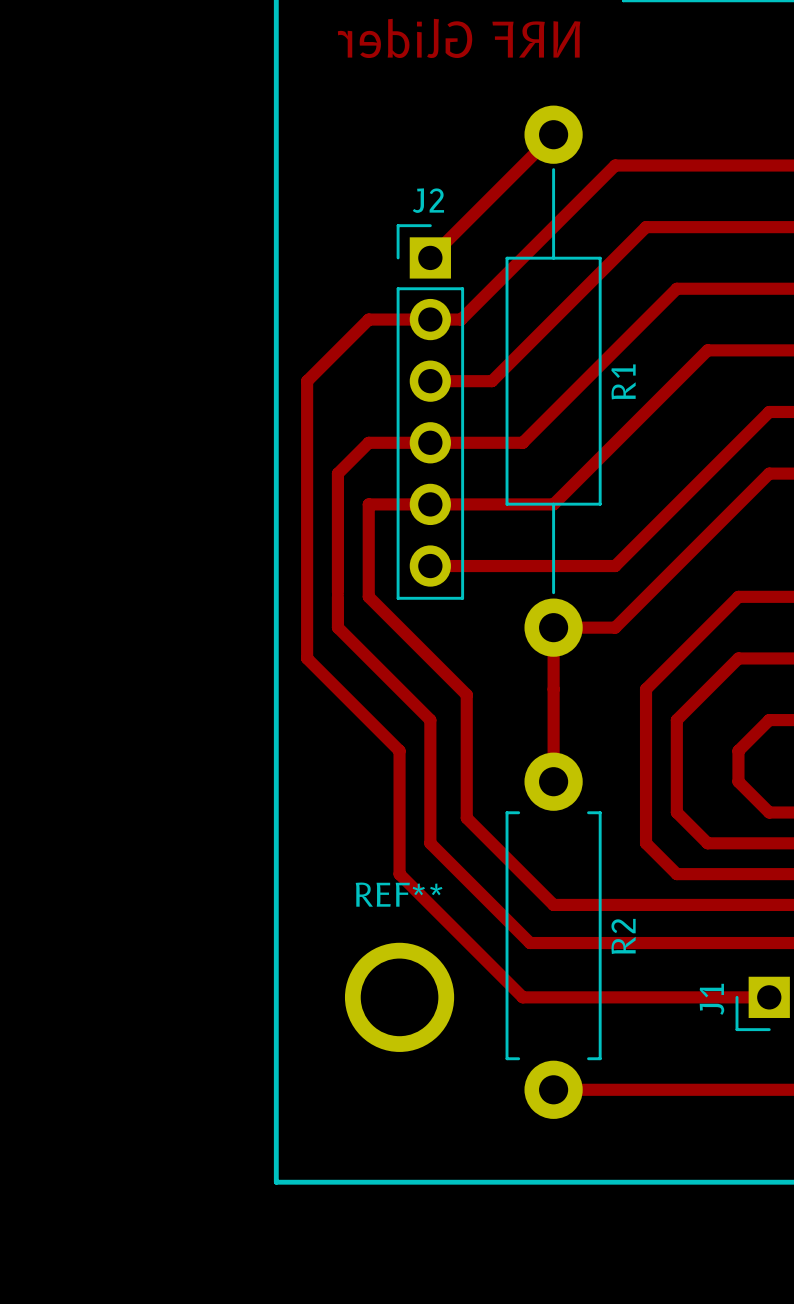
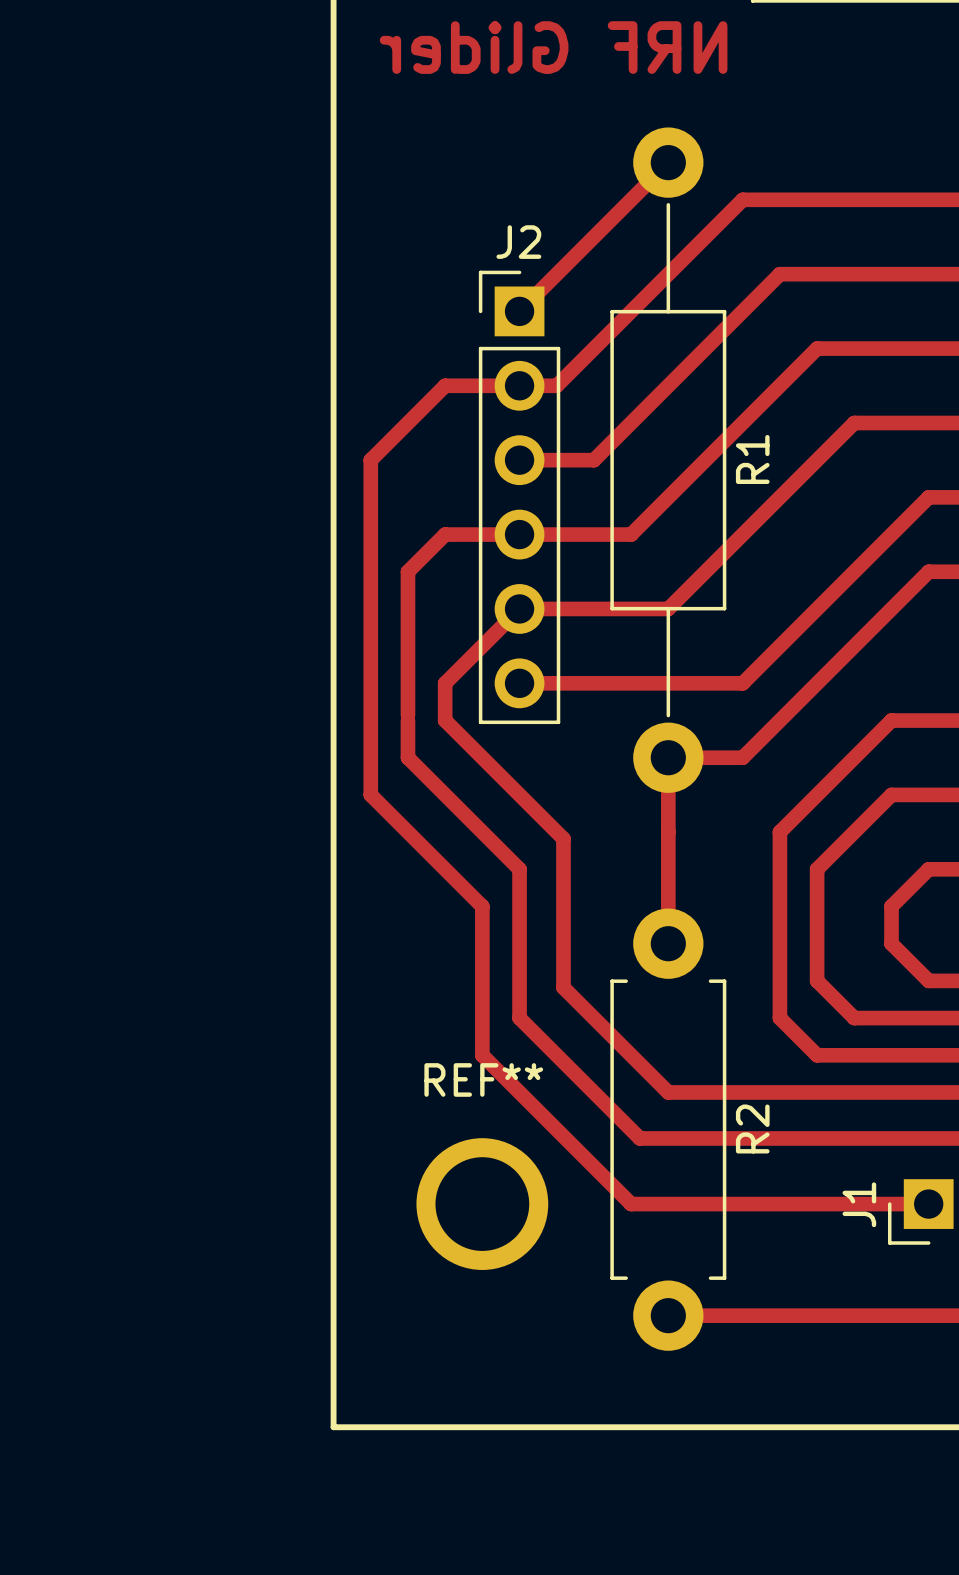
top track: (430, 504) (368, 504) (368, 566) -> (519, 608) (445, 683)

